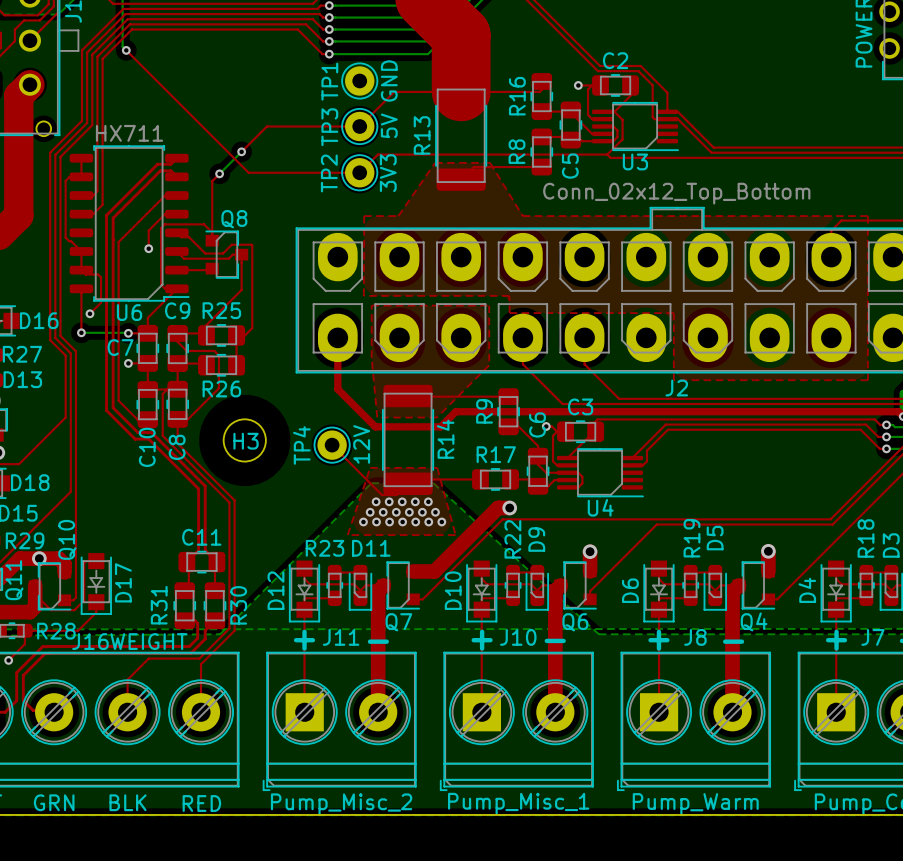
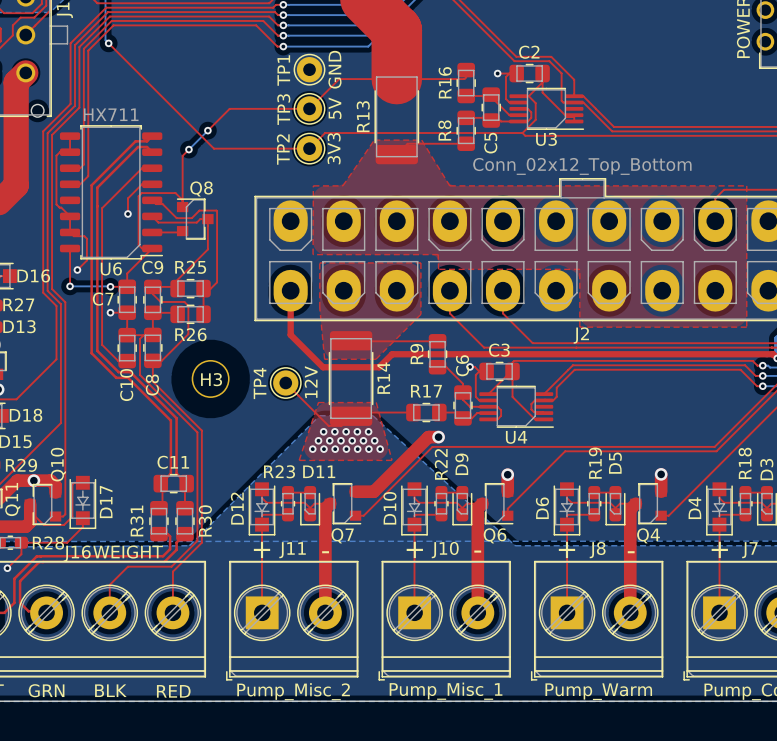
top track: none -> (542, 82) (542, 92) (567, 117) (574, 115) (574, 121)
top track: none -> (512, 371) (512, 396) (534, 419) (544, 419)
top track: none -> (544, 400) (534, 400) (531, 403) (531, 409) (534, 412) (544, 413)

